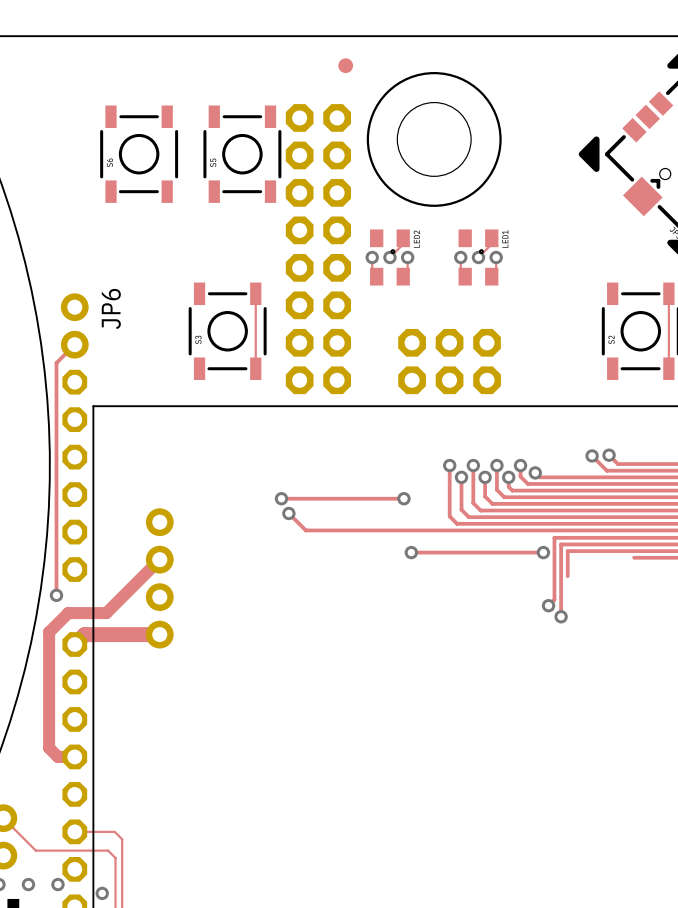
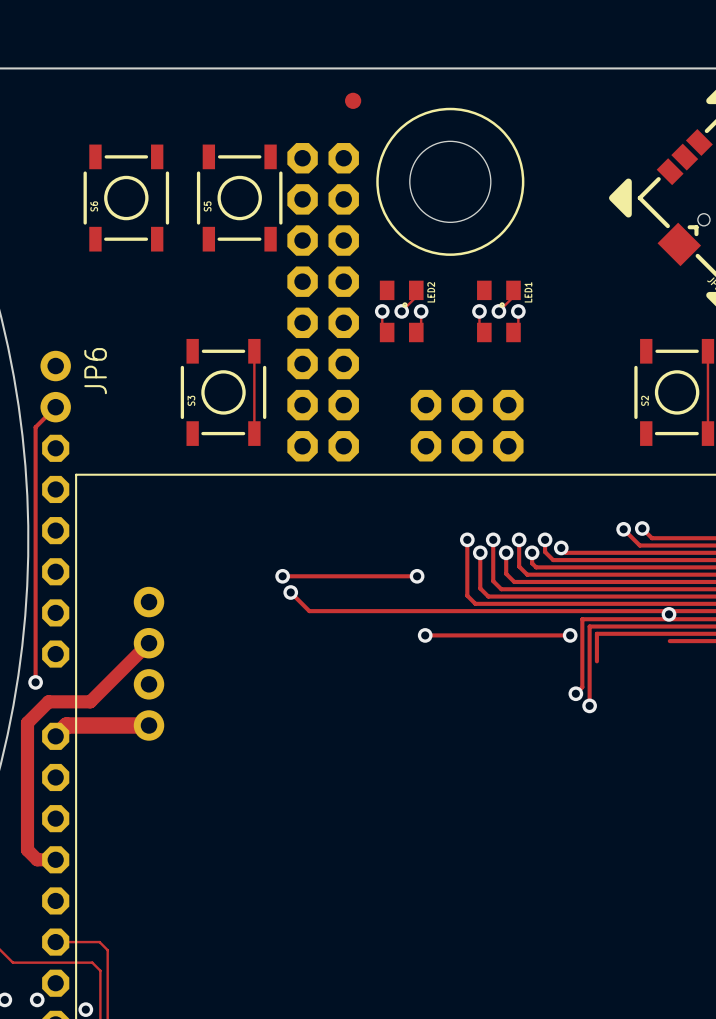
via: none -> (669, 614)

